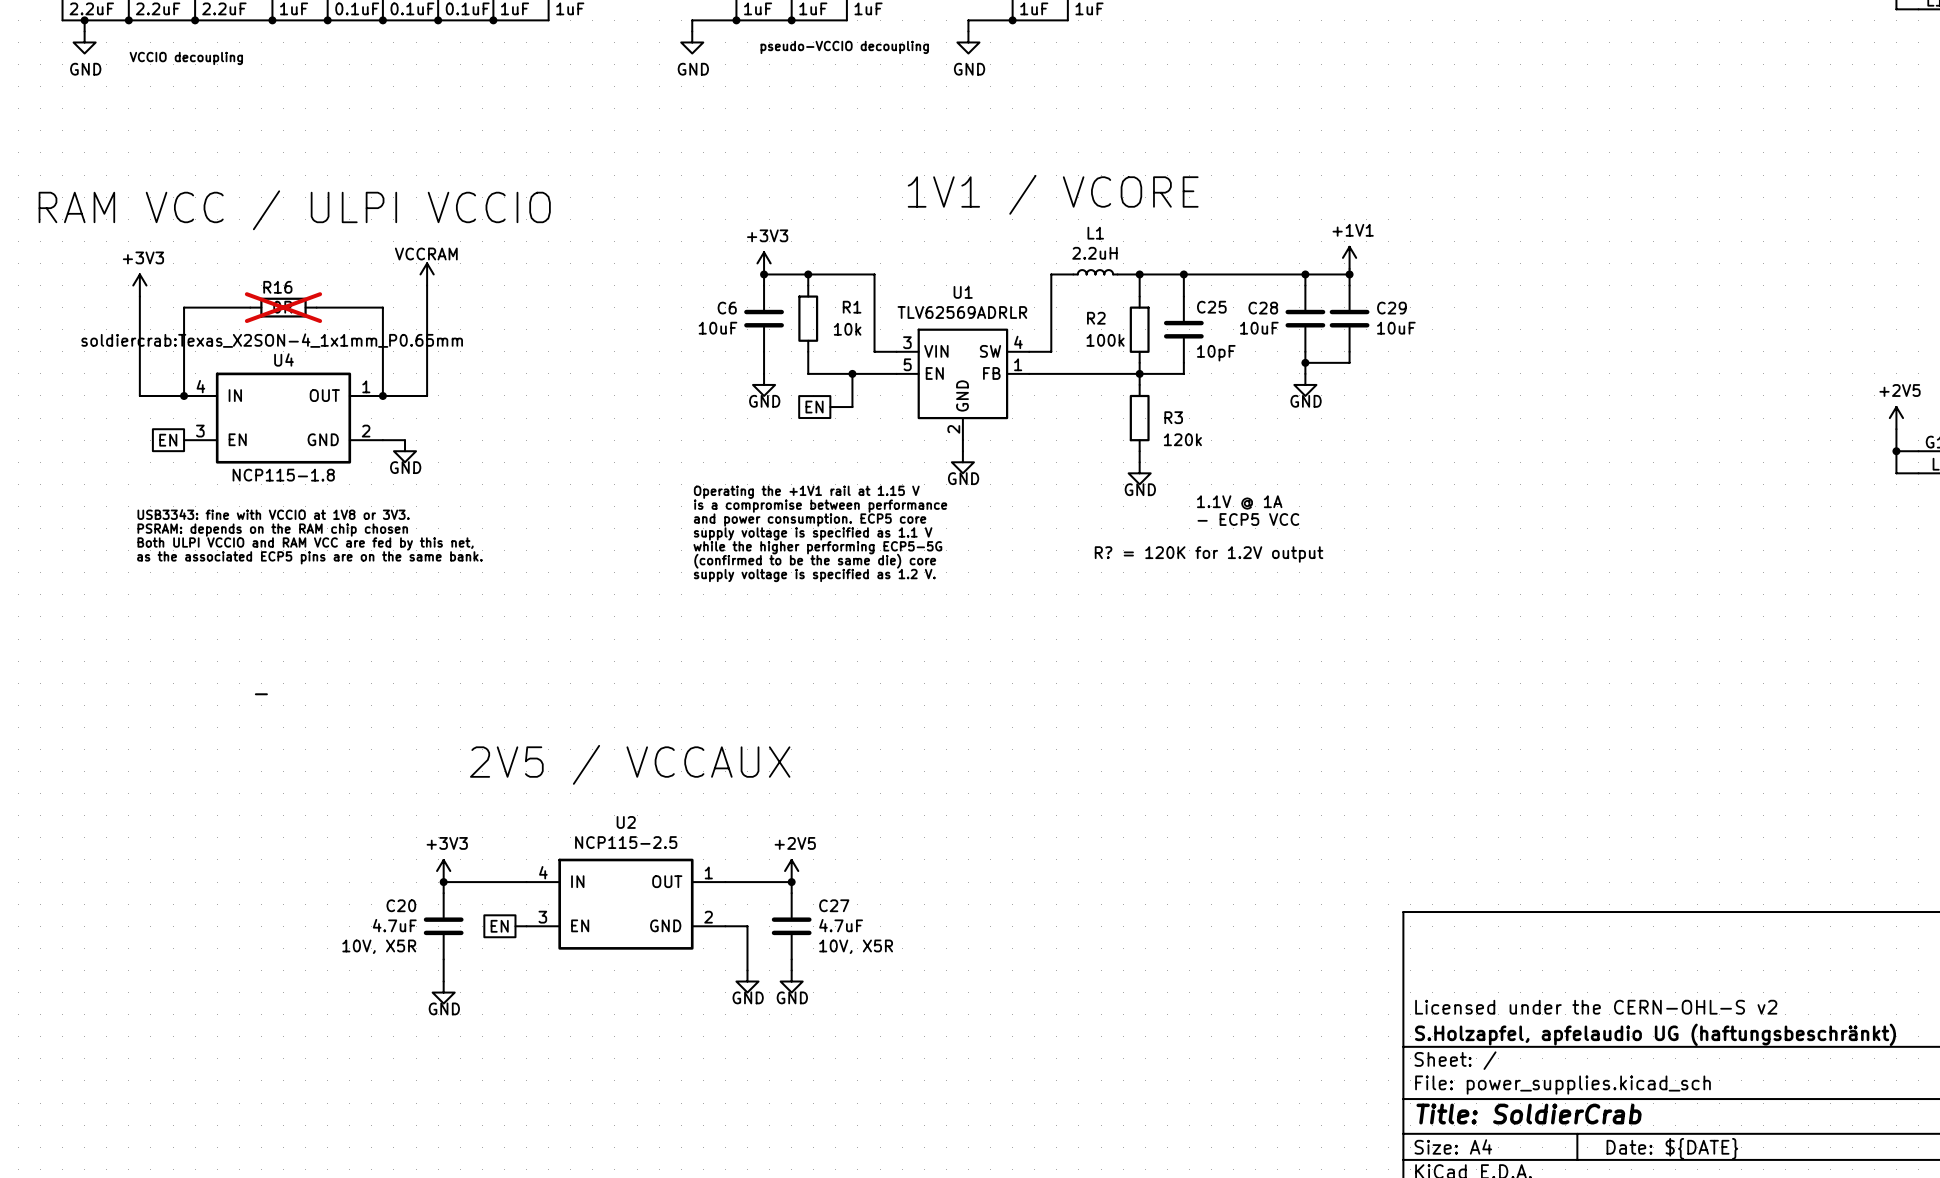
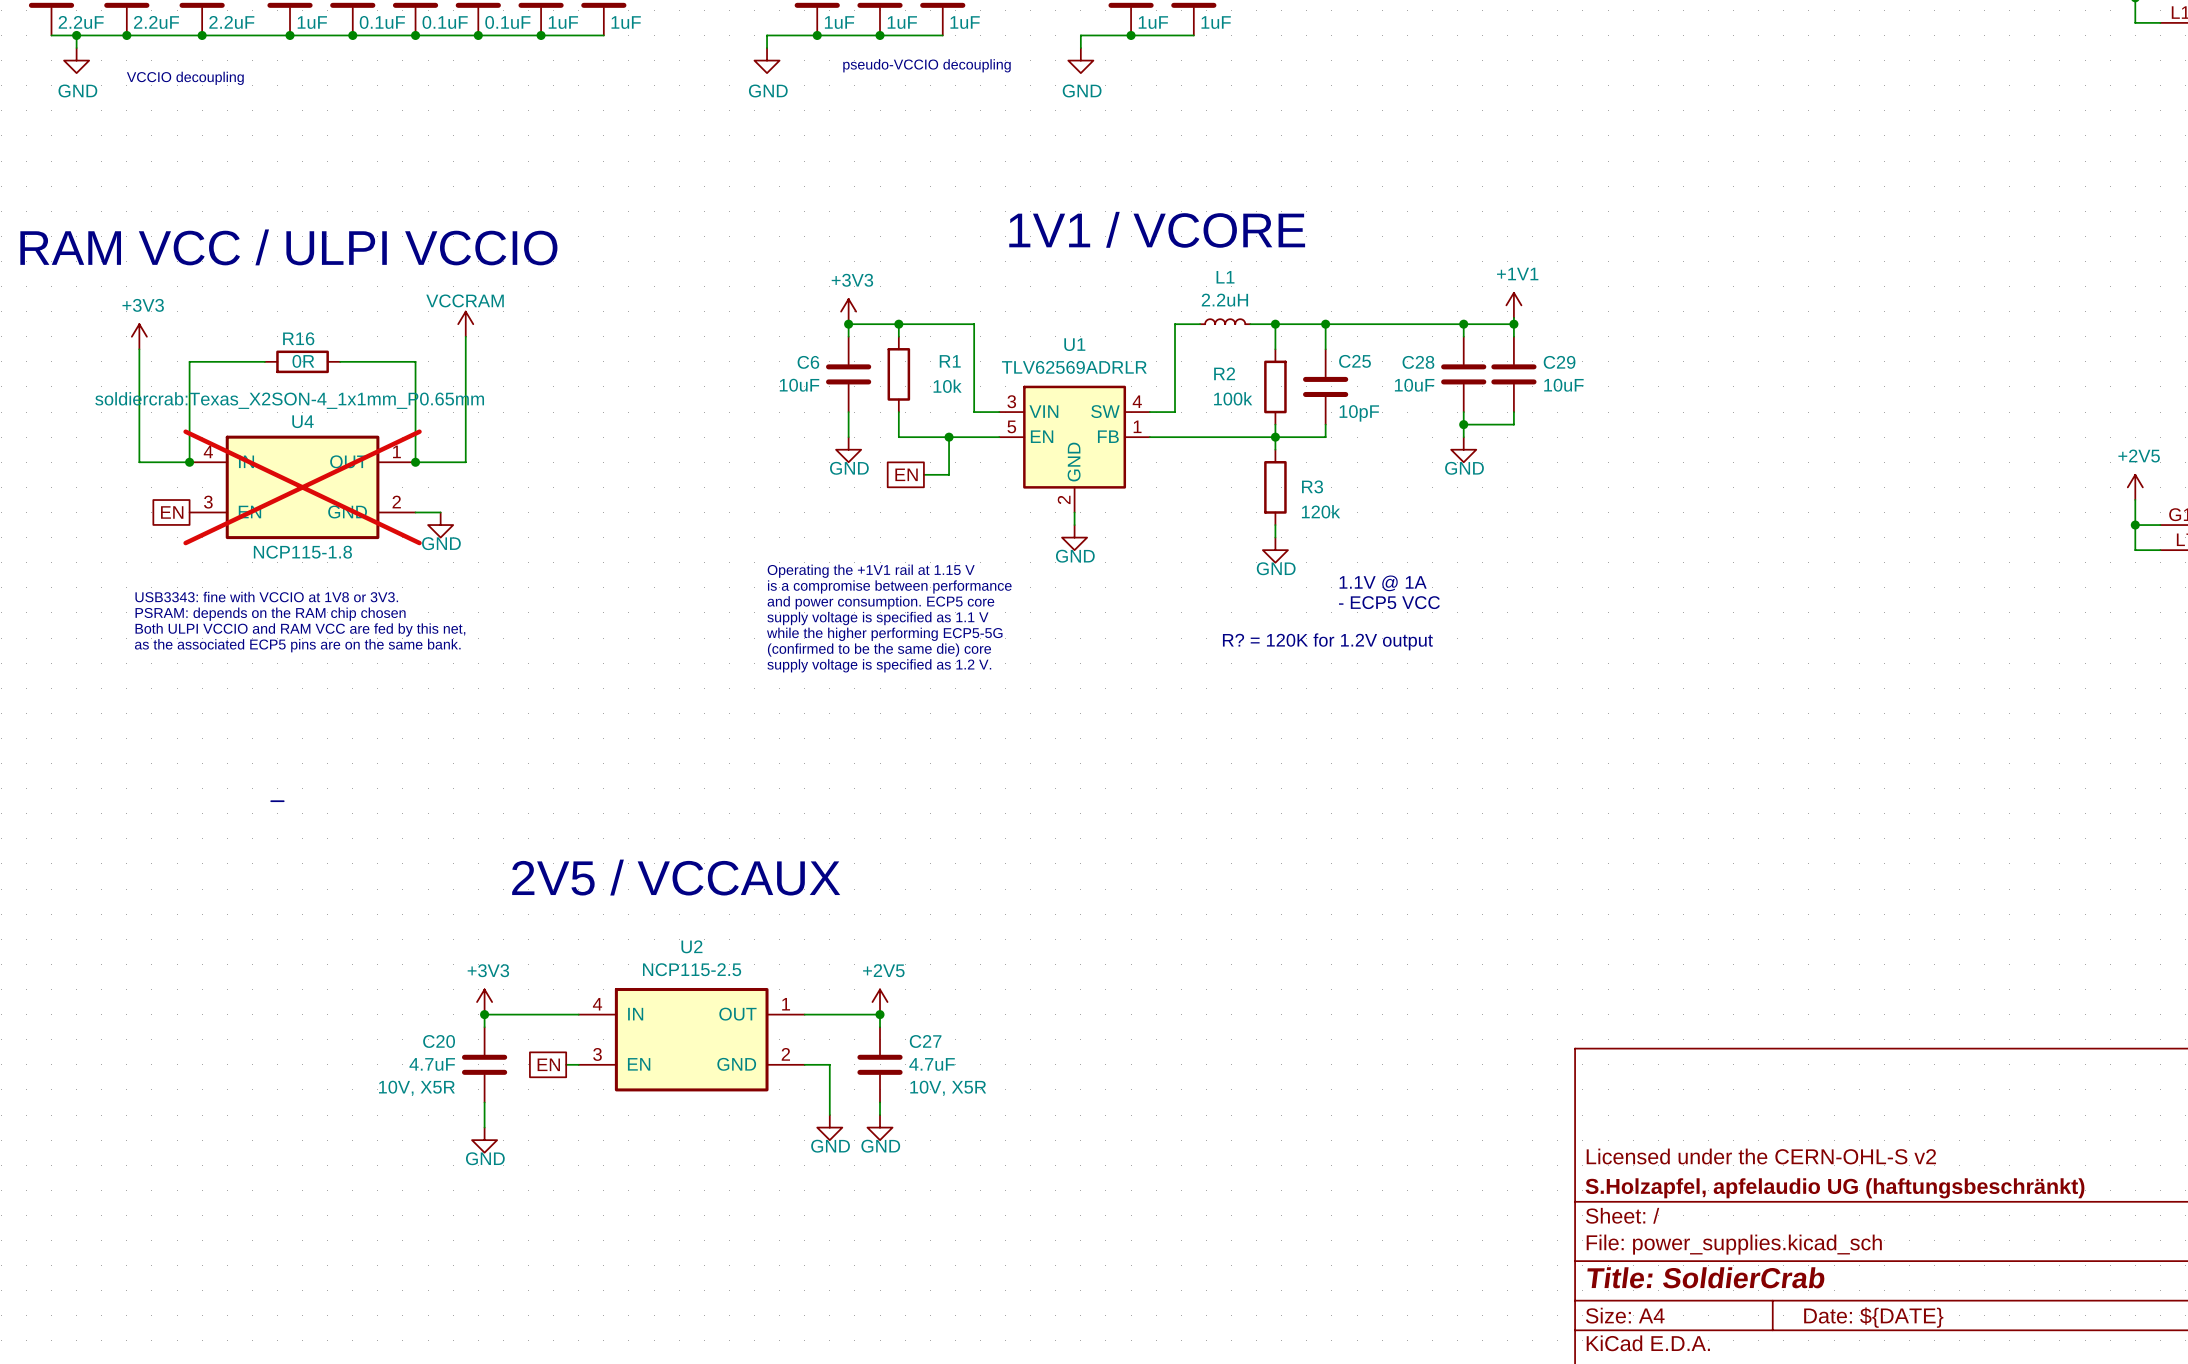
R16 do-not-place cross: (283, 307) -> none
U4 do-not-place cross: none -> (302, 487)

